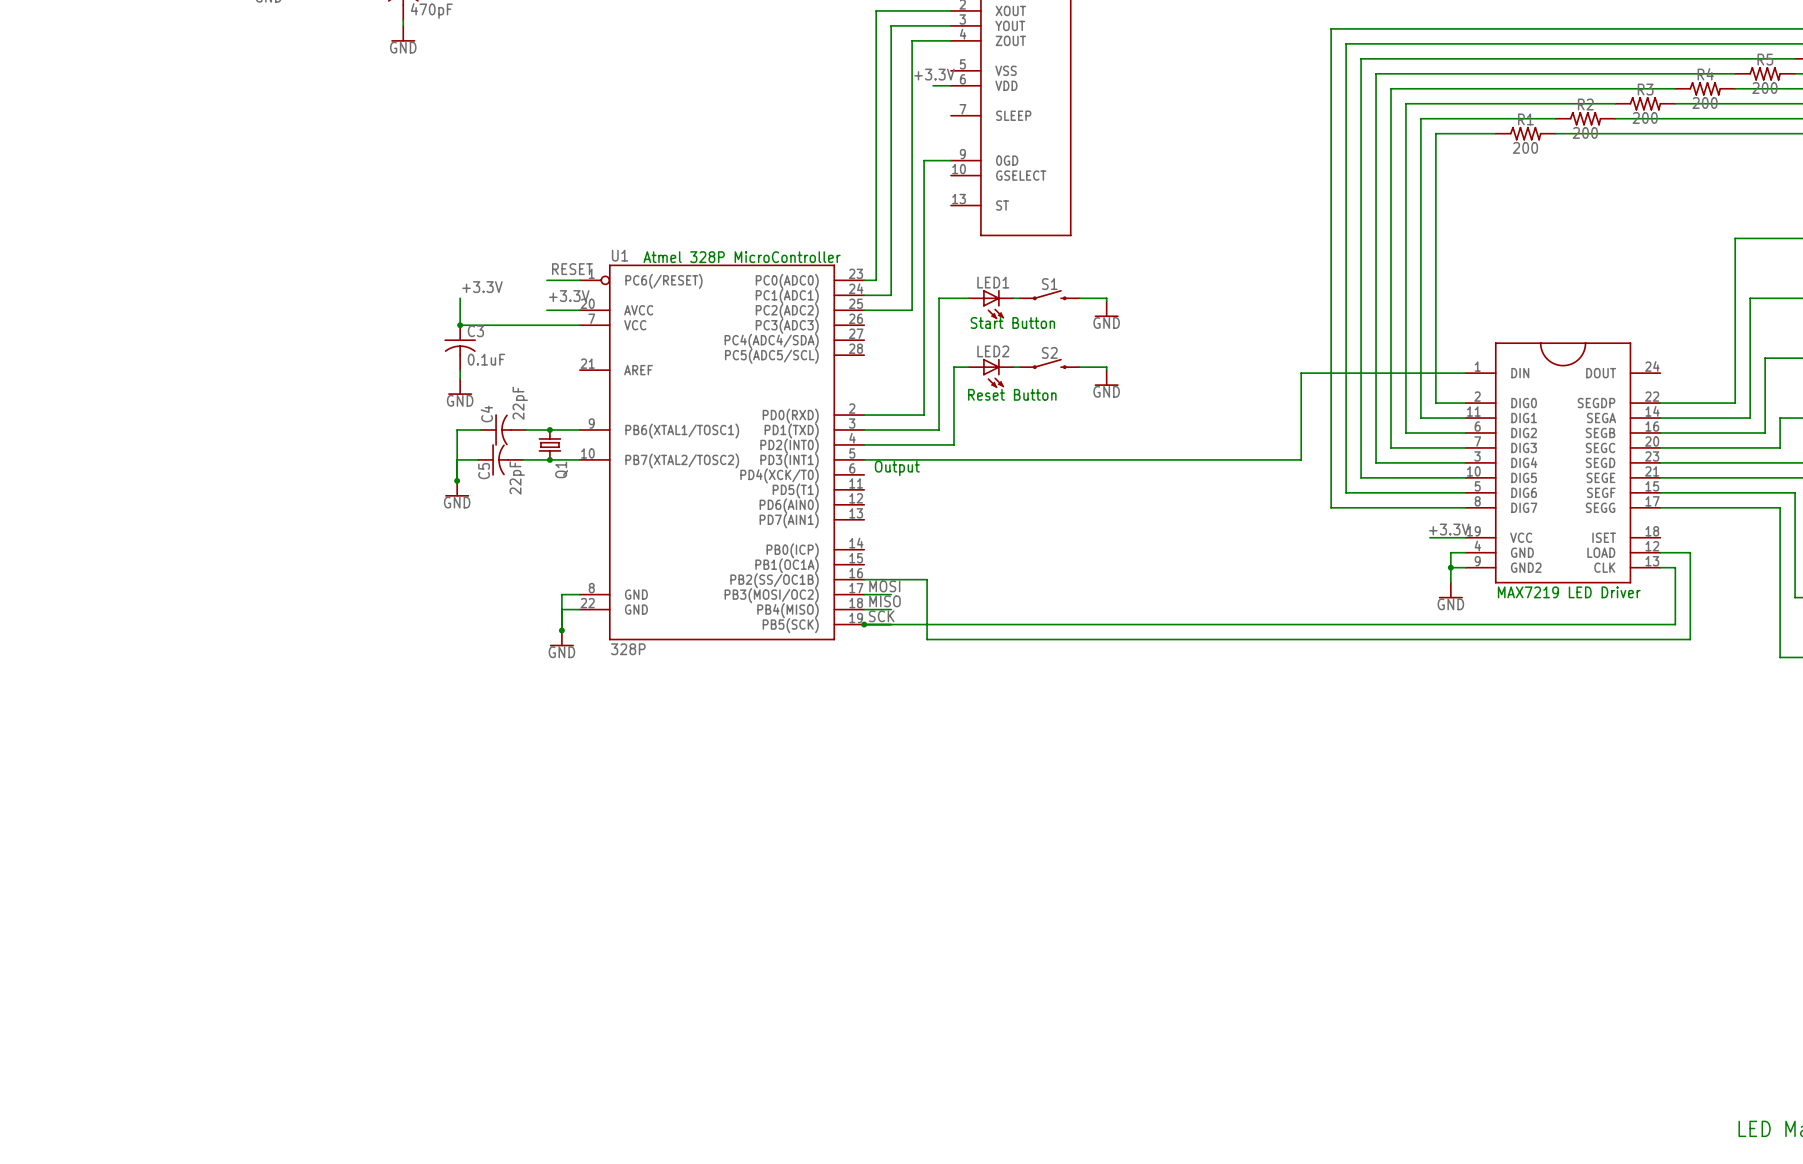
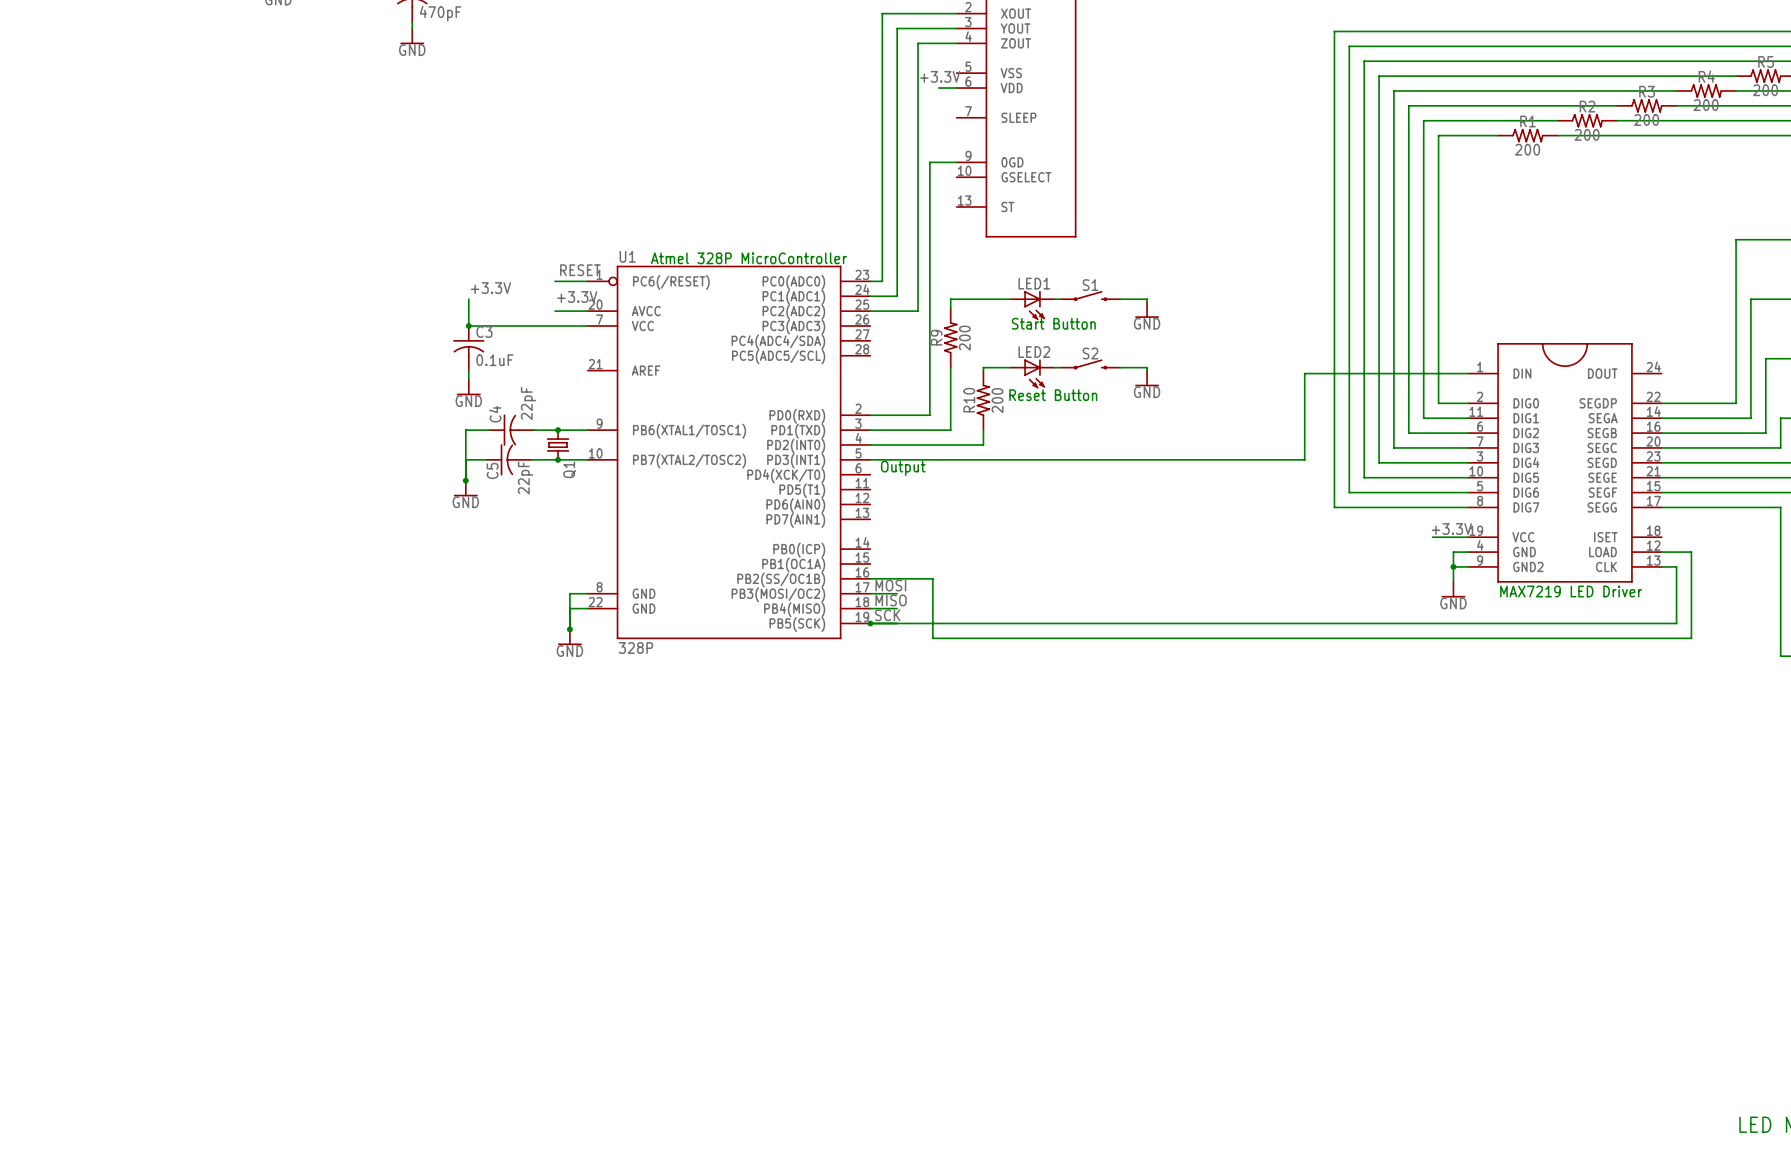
S1 position: (1049, 295) -> (1090, 296)
wire: (945, 298) (939, 298) (939, 430) -> (950, 367) (950, 430) (944, 430)
wire: none -> (950, 299) (950, 308)
wire: (1079, 298) (1106, 298) (1106, 301) -> (1120, 299) (1147, 299) (1147, 302)
LED1 position: (991, 304) -> (1032, 305)
power symbol position: GND (1106, 309) -> GND (1147, 310)
text position: Start Button (1012, 322) -> Start Button (1053, 323)
R9: none -> 200 (950, 337)
S2 position: (1049, 364) -> (1090, 364)
wire: (968, 367) (954, 367) (954, 444) -> (983, 430) (983, 444) (959, 444)
wire: (1079, 367) (1106, 367) (1106, 370) -> (1120, 367) (1147, 367) (1147, 370)
LED2 position: (991, 373) -> (1032, 373)
power symbol position: GND (1106, 377) -> GND (1147, 378)
text position: Reset Button (1012, 394) -> Reset Button (1053, 395)
R10: none -> 200 (983, 400)

